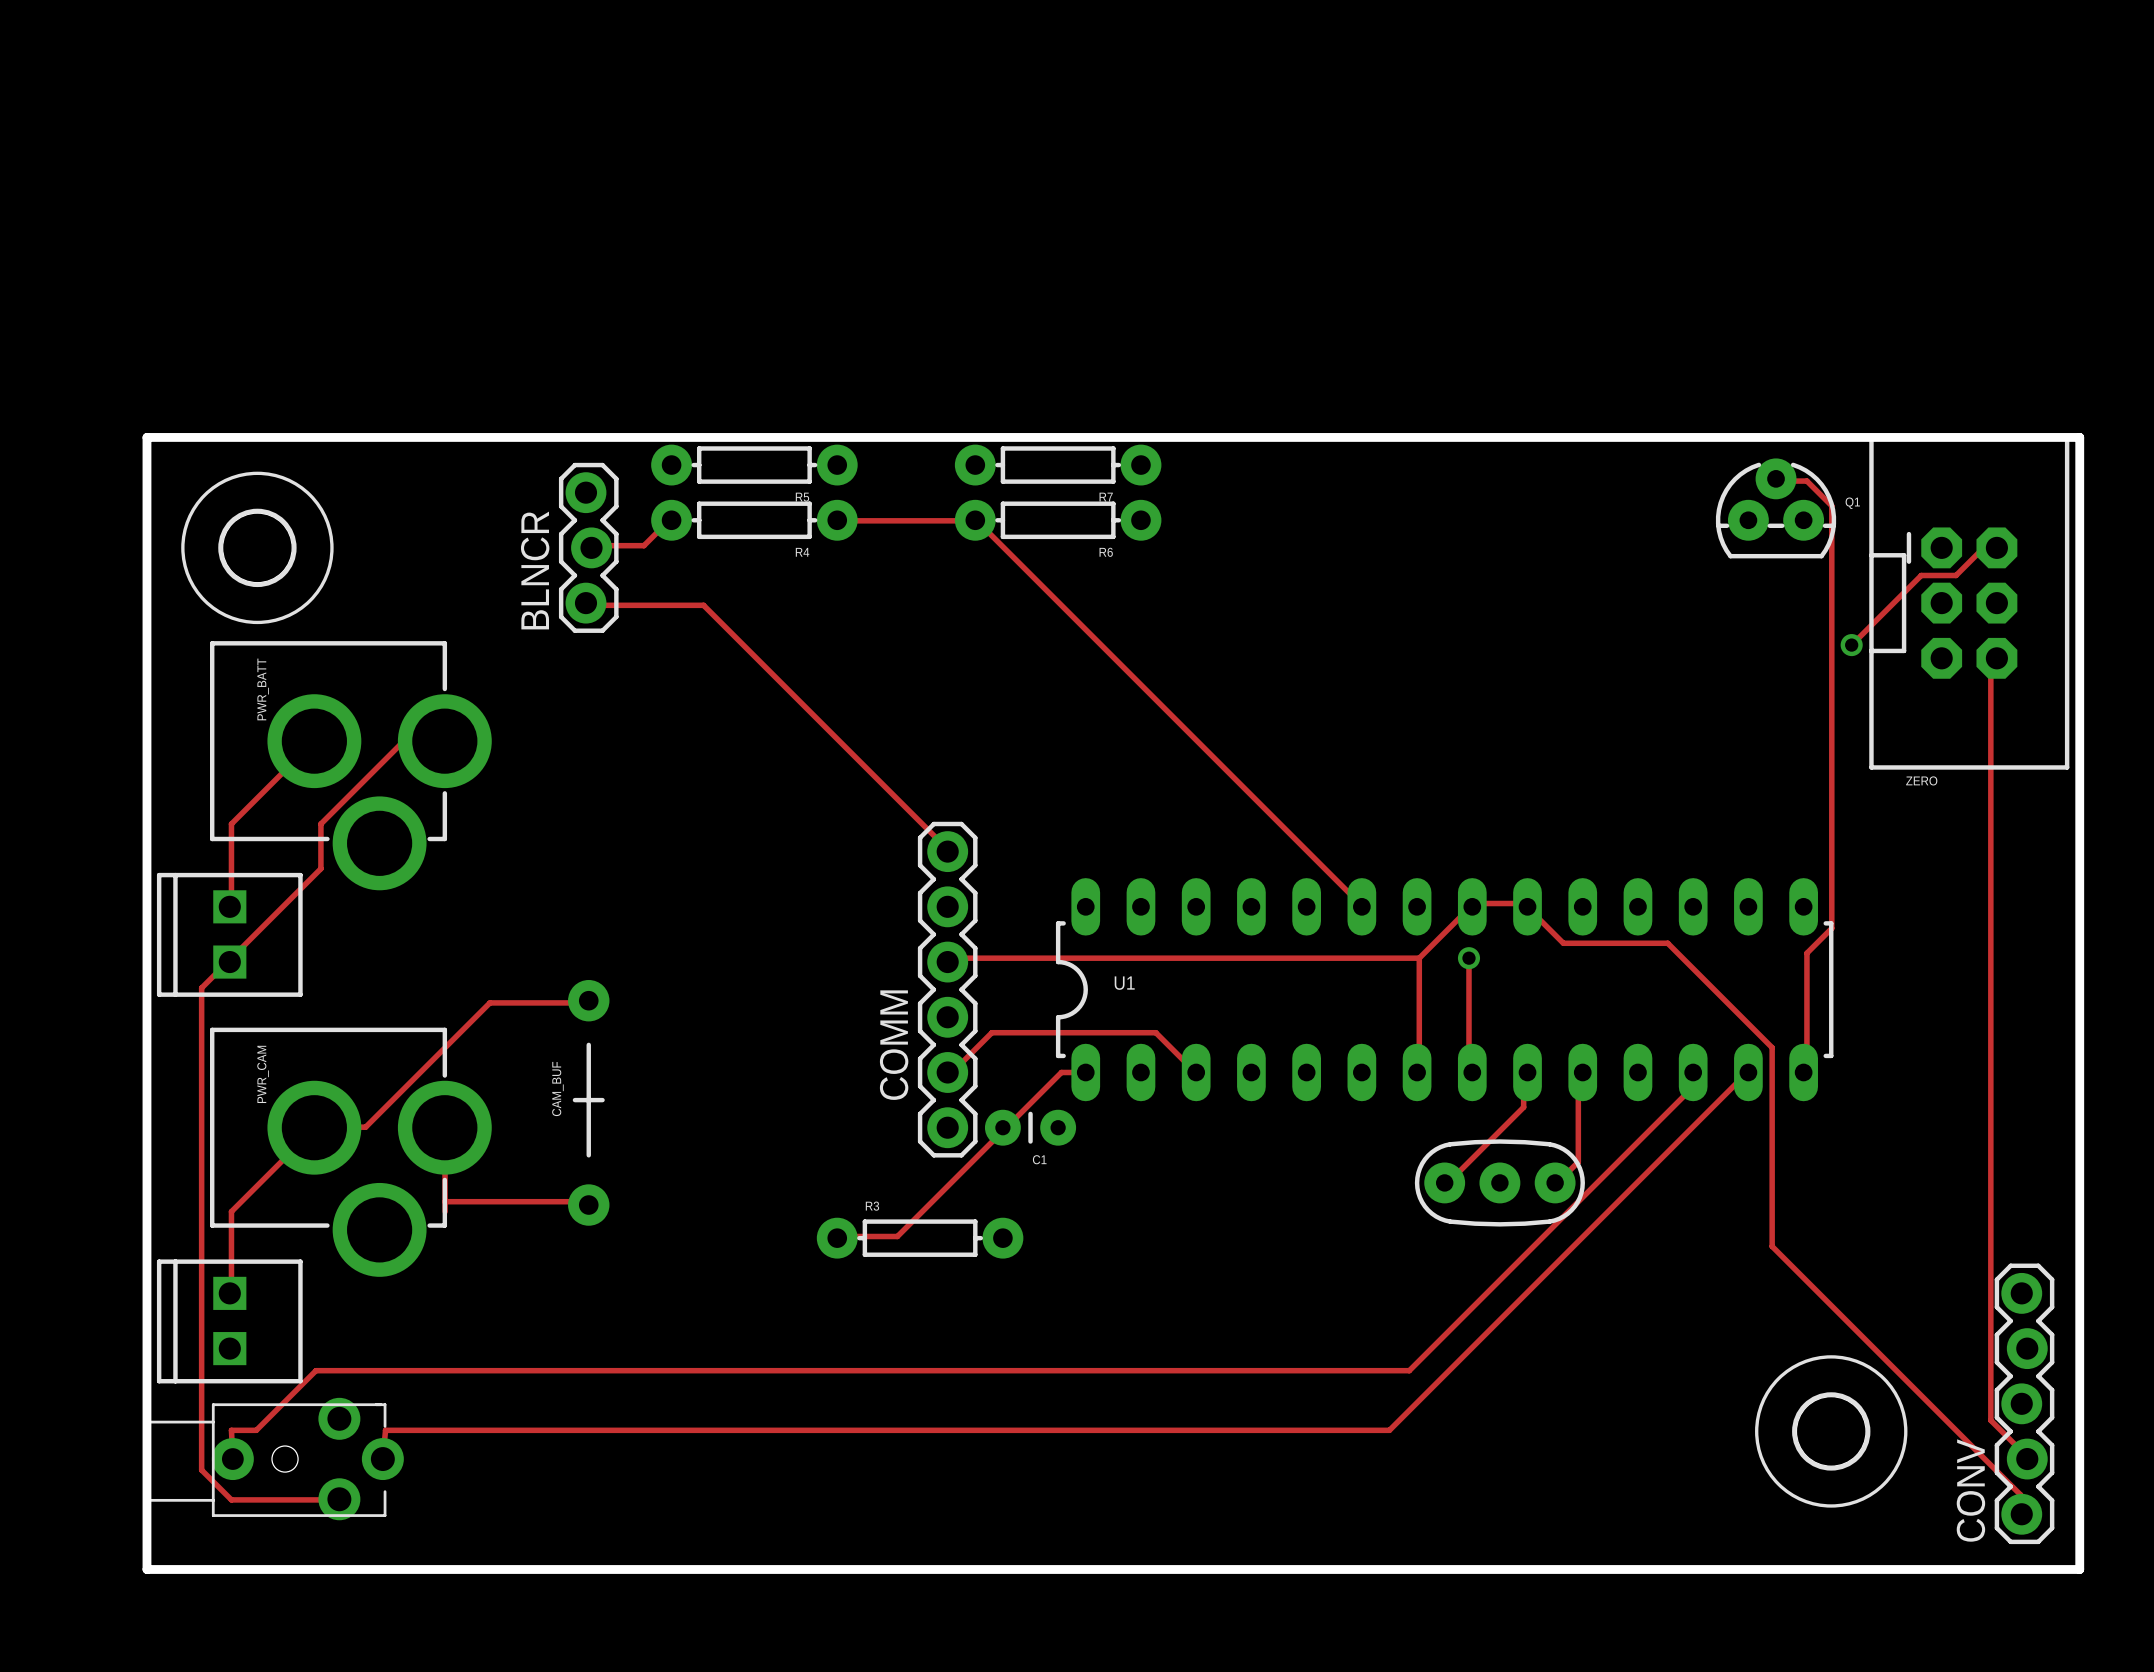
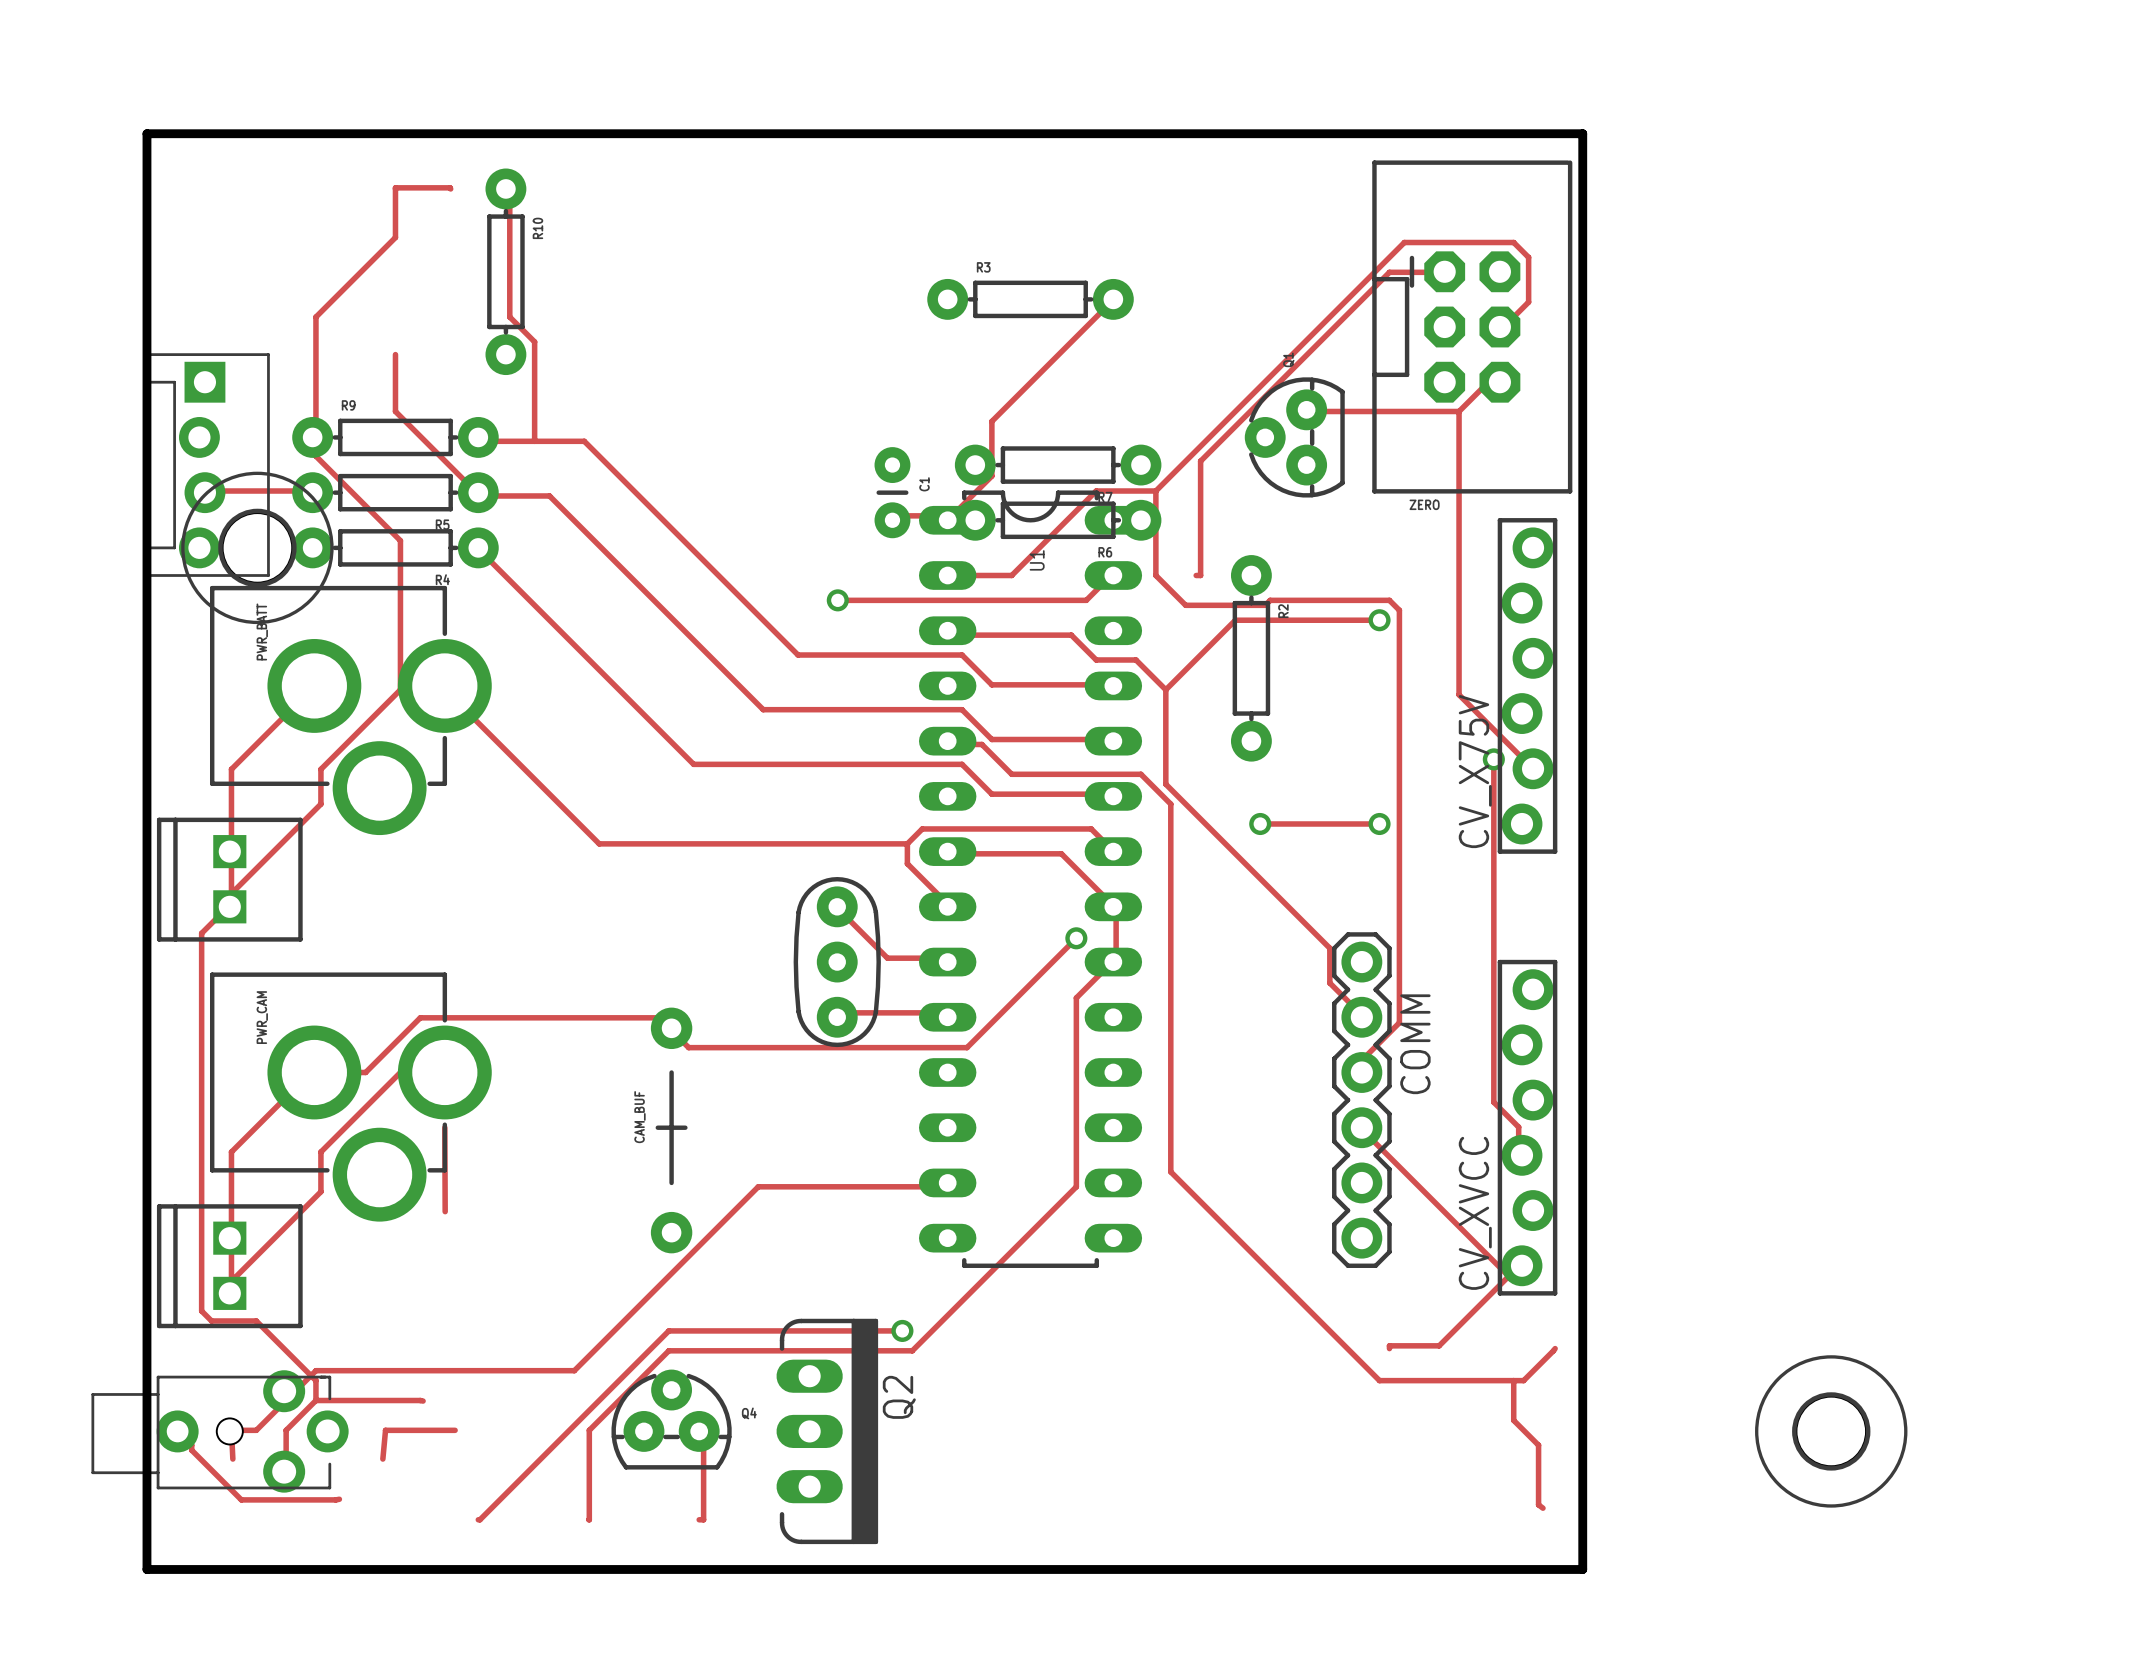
track: none -> (450, 188) (395, 187) (395, 237) (315, 317) (315, 436) (312, 437) (315, 441) (315, 456) (400, 540) (400, 689)
track: none -> (505, 188) (509, 192) (509, 317) (534, 341) (534, 441)
R10: none -> (505, 271)
track: none -> (1444, 271) (1389, 272) (1200, 461) (1200, 575) (1196, 575)
track: none -> (1113, 299) (991, 421) (991, 476) (947, 520) (947, 515) (892, 515) (892, 520)
ZERO: none -> (1472, 327)
track: none -> (1499, 327) (1503, 327) (1528, 302) (1528, 257) (1513, 242) (1404, 242) (1155, 491)
track: none -> (395, 354) (395, 411) (479, 495) (549, 495) (763, 709) (962, 709) (991, 739) (1111, 739) (1113, 741)
track: none -> (1499, 382) (1498, 386) (1483, 386) (1459, 411)
track: none -> (1306, 409) (1309, 411) (1459, 411)
track: none -> (1459, 411) (1459, 694) (1533, 768)
board edge: (146, 437) (2079, 437) (2079, 1569) (1582, 1569) -> (146, 437) (146, 133) (1582, 133) (1582, 1569)
R9: none -> (395, 437)
track: none -> (478, 437) (479, 441) (584, 441) (798, 655) (962, 655) (991, 684) (1113, 685)
part: none -> (207, 465)
R5 position: (754, 465) -> (395, 492)
track: (1776, 478) (1777, 481) (1806, 481) (1831, 505) (1831, 928) (1806, 953) (1806, 1072) (1803, 1072) -> none
track: none -> (1155, 491) (1096, 491) (1011, 575) (947, 575)
track: none -> (1155, 491) (1155, 575) (1185, 605) (1265, 605) (1270, 600) (1389, 600) (1399, 610) (1399, 1022) (1364, 1057) (1364, 1072) (1361, 1072)
track: none -> (204, 492) (206, 491) (310, 491) (312, 492)
Q1 rotation: 0° (1776, 508) -> 90° counterclockwise (1294, 437)
Q1 position: (1776, 508) -> (1294, 437)
track: (671, 520) (643, 545) (594, 545) (591, 547) -> none
R4 position: (754, 520) -> (395, 547)
track: (837, 520) (976, 520) (1361, 906) -> none
track: none -> (478, 547) (693, 764) (962, 764) (991, 794) (1111, 794) (1113, 796)
BLNCR: (588, 547) -> none
track: (1996, 547) (1995, 550) (1980, 550) (1956, 575) (1921, 575) (1851, 645) -> none
track: none -> (1113, 575) (1086, 600) (837, 600)
track: (584, 600) (589, 605) (703, 605) (947, 848) (947, 851) -> (588, 1519) (589, 1430) (668, 1350) (912, 1350) (1076, 1186) (1076, 997) (1116, 958) (1116, 908) (1061, 853) (952, 853) (947, 851)
via: none -> (837, 600)
ZERO: (1969, 603) -> none
track: none -> (1379, 620) (1235, 620) (1165, 689)
via: none -> (1379, 620)
track: none -> (947, 630) (952, 635) (1071, 635) (1096, 659) (1136, 659) (1165, 689)
via: (1851, 645) -> none
R2: none -> (1251, 658)
track: (1996, 658) (1990, 664) (1990, 1420) (2027, 1459) -> none
track: none -> (444, 685) (445, 689) (599, 843) (907, 843)
CV_X75V: none -> (1527, 685)
track: none -> (400, 689) (320, 769) (320, 804) (231, 893)
track: none -> (1165, 689) (1165, 784) (1329, 948) (1329, 983) (1361, 1017)
track: (314, 741) (231, 823) -> (314, 685) (231, 769) (231, 823)
track: (444, 741) (440, 744) (400, 744) (320, 823) (320, 868) (231, 958) (229, 962) (201, 988) -> (229, 906) (201, 933) (201, 988)
track: none -> (947, 741) (952, 744) (981, 744) (1011, 774) (1140, 774) (1170, 804) (1170, 1171) (1379, 1380) (1523, 1380) (1555, 1348)
track: none -> (1493, 759) (1493, 1102) (1518, 1127) (1518, 1152) (1522, 1155)
via: none -> (1493, 759)
PWR_BATT position: (350, 765) -> (350, 710)
track: none -> (1260, 823) (1379, 823)
via: none -> (1260, 823)
via: none -> (1379, 823)
track: none -> (907, 843) (907, 863) (947, 903) (947, 906)
track: none -> (907, 843) (922, 828) (1091, 828) (1113, 851)
part position: (229, 934) -> (229, 879)
via: none -> (1076, 938)
track: (1419, 958) (952, 958) (947, 962) -> (837, 906) (887, 958) (947, 958) (947, 962)
track: (1419, 958) (1419, 1072) (1417, 1072) -> none
track: (1419, 958) (1473, 903) (1523, 903) (1563, 943) (1667, 943) (1772, 1047) (1772, 1246) (2020, 1494) (2021, 1514) -> none
track: (1468, 958) (1468, 1072) (1472, 1072) -> none
via: (1468, 958) -> none
part: none -> (837, 962)
COMM position: (947, 989) -> (1361, 1100)
U1 rotation: 0° (1444, 989) -> 90° clockwise (1030, 879)
track: (588, 1000) (584, 1002) (489, 1002) (365, 1127) (314, 1127) (231, 1211) -> (1076, 938) (967, 1047) (688, 1047) (671, 1028) (658, 1017) (420, 1017) (365, 1072) (310, 1072) (231, 1152) (231, 1211)
track: none -> (837, 1017) (837, 1012) (947, 1012) (947, 1017)
COMM name position: COMM (894, 1045) -> COMM (1415, 1044)
track: none -> (444, 1072) (400, 1072) (320, 1152) (320, 1191) (231, 1281)
track: (947, 1072) (952, 1072) (991, 1032) (1155, 1032) (1196, 1072) -> none
track: (1085, 1072) (1061, 1072) (1006, 1127) (1002, 1127) (1001, 1132) (897, 1236) (837, 1236) (837, 1238) -> none
track: (1527, 1072) (1523, 1072) (1523, 1107) (1449, 1181) (1444, 1182) -> none
track: (1582, 1072) (1578, 1072) (1578, 1161) (1555, 1182) -> none
track: (1693, 1072) (1692, 1087) (1409, 1370) (574, 1370) -> (947, 1182) (947, 1186) (758, 1186) (574, 1370)
track: (1748, 1072) (1389, 1430) (455, 1430) -> none
CAM_BUF position: (588, 1102) -> (671, 1130)
C1 rotation: 0° (1030, 1127) -> 90° clockwise (892, 492)
C1 position: (1030, 1127) -> (892, 492)
track: none -> (1361, 1127) (1364, 1132) (1508, 1276) (1522, 1265) (1518, 1266) (1439, 1345) (1389, 1345) (1389, 1348)
CV_XVCC: none -> (1527, 1127)
PWR_CAM position: (350, 1152) -> (350, 1097)
C1 name position: C1 (1039, 1159) -> C1 (924, 484)
part: (1499, 1182) -> none
track: (445, 1201) (584, 1201) (588, 1205) -> none
R3 position: (920, 1238) -> (1030, 299)
track: (201, 1311) (201, 1470) (231, 1499) (241, 1499) -> (177, 1431) (191, 1445) (191, 1450) (241, 1499)
track: none -> (201, 1311) (211, 1320) (256, 1320) (315, 1380) (315, 1400)
part position: (229, 1321) -> (229, 1266)
track: none -> (902, 1330) (668, 1330) (478, 1519)
via: none -> (902, 1330)
track: none -> (1513, 1380) (1513, 1420) (1538, 1445) (1538, 1504) (1542, 1508)
track: none -> (315, 1400) (286, 1430) (286, 1470) (284, 1471)
track: none -> (315, 1400) (423, 1401)
CONV: (2024, 1403) -> none
Q4: none -> (671, 1419)
track: none -> (699, 1431) (703, 1435) (703, 1519) (699, 1519)
Q2: none -> (827, 1431)
part position: (275, 1459) -> (220, 1431)

